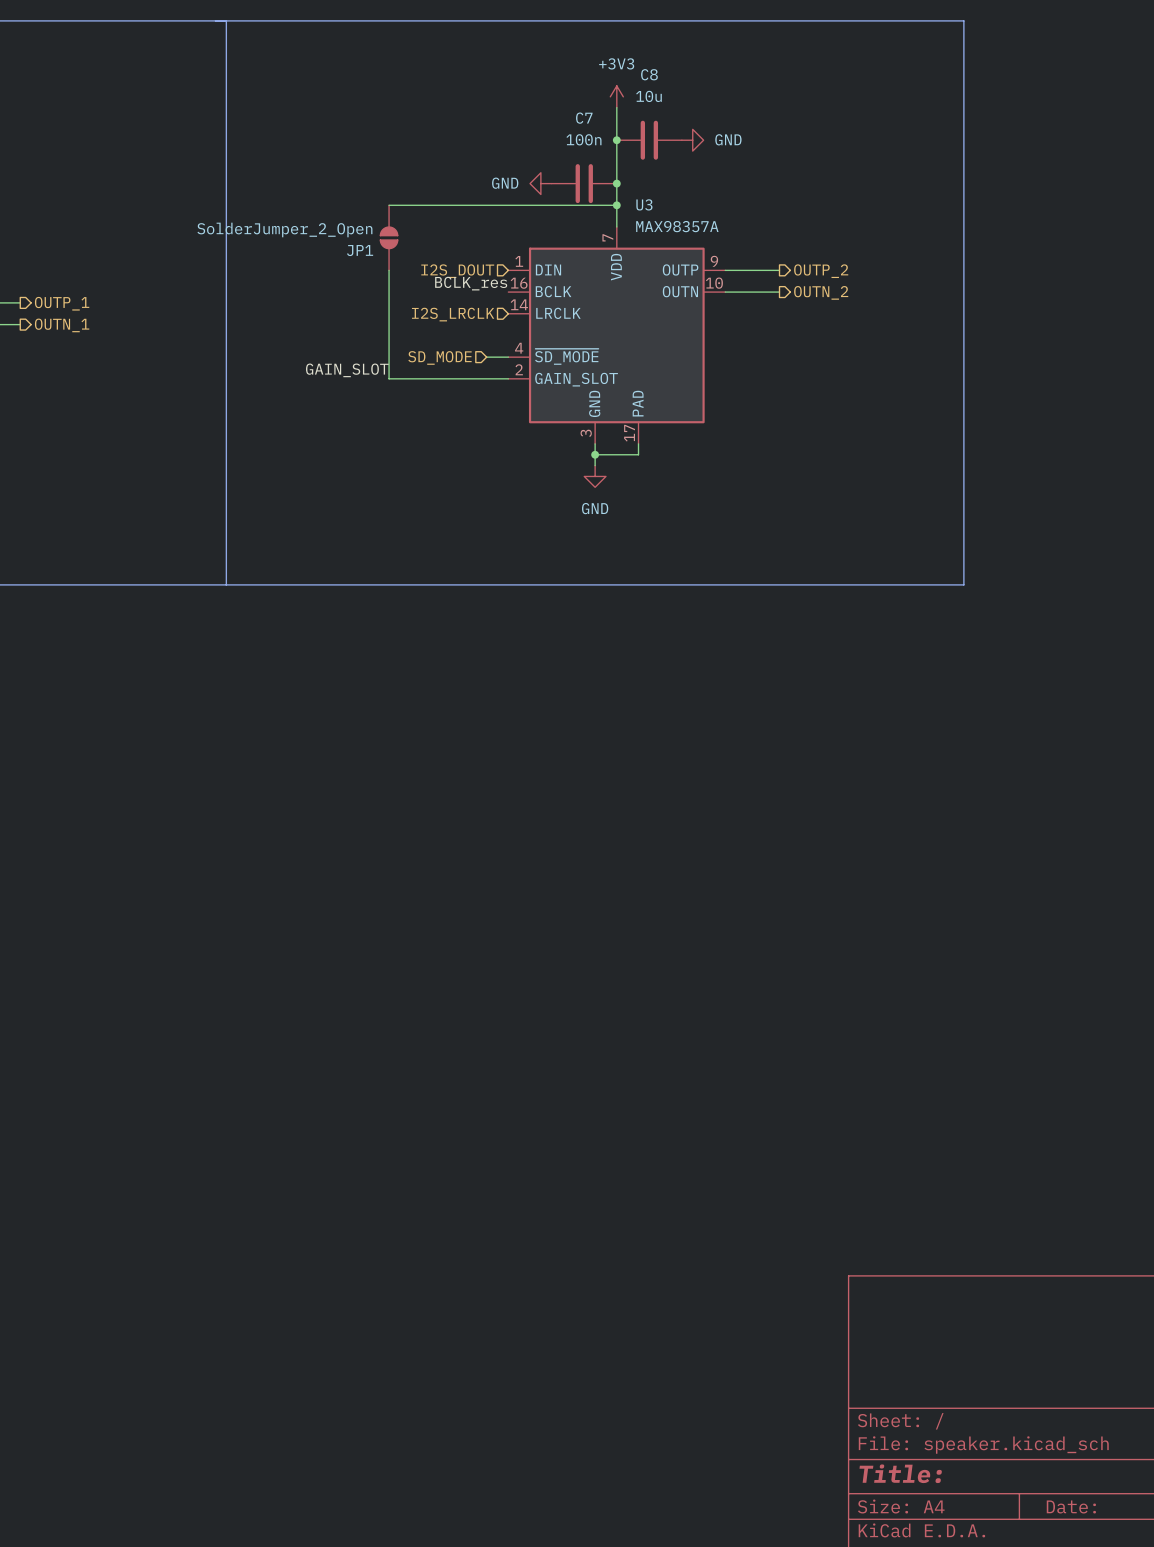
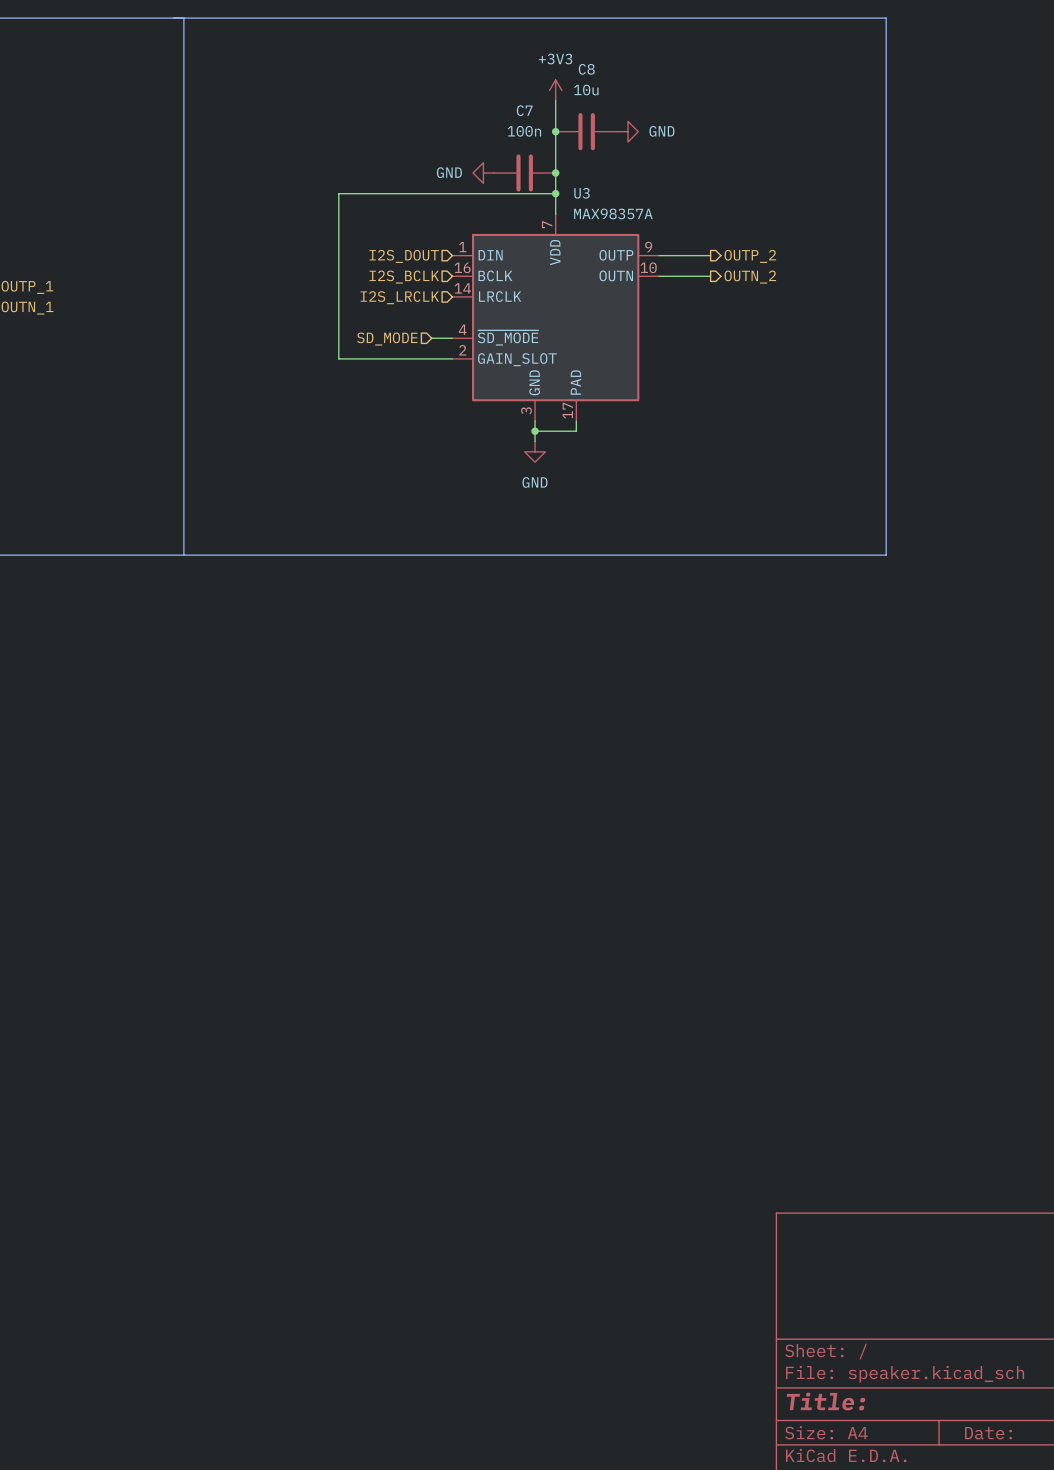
JP1: SolderJumper_2_Open (389, 237) -> none
label: BCLK_res (471, 283) -> none
hierarchical label: none -> I2S_BCLK (404, 277)
label: GAIN_SLOT (347, 370) -> none

